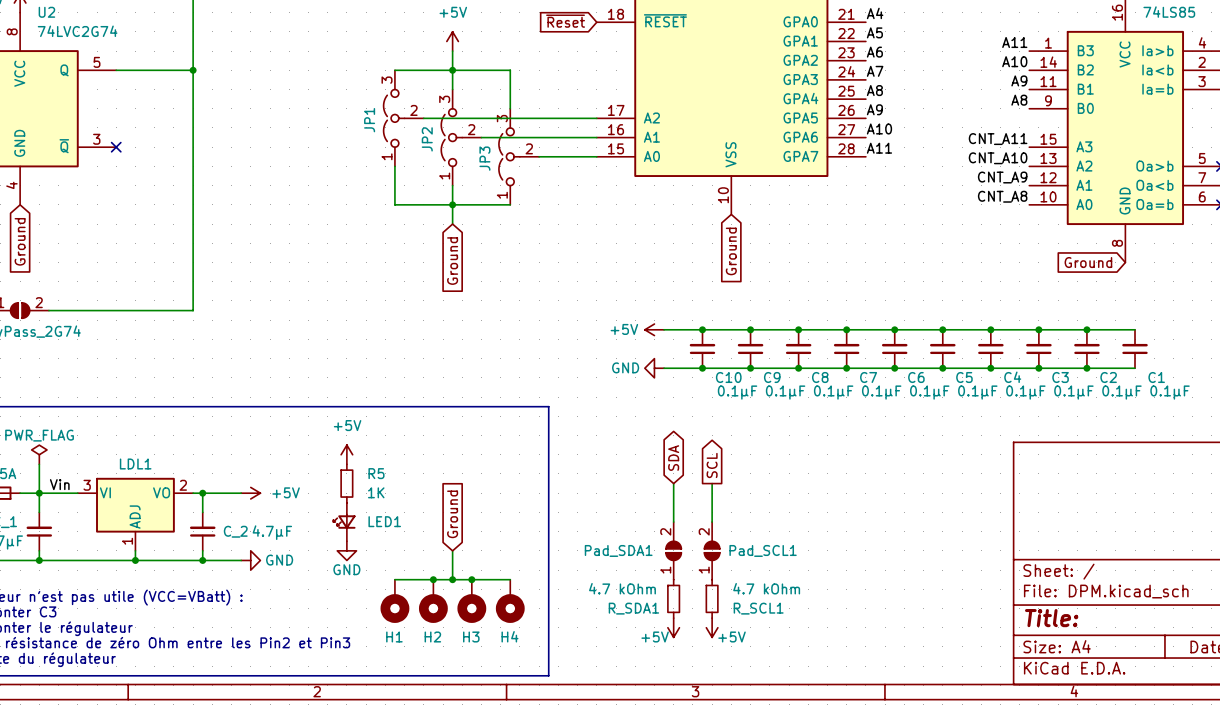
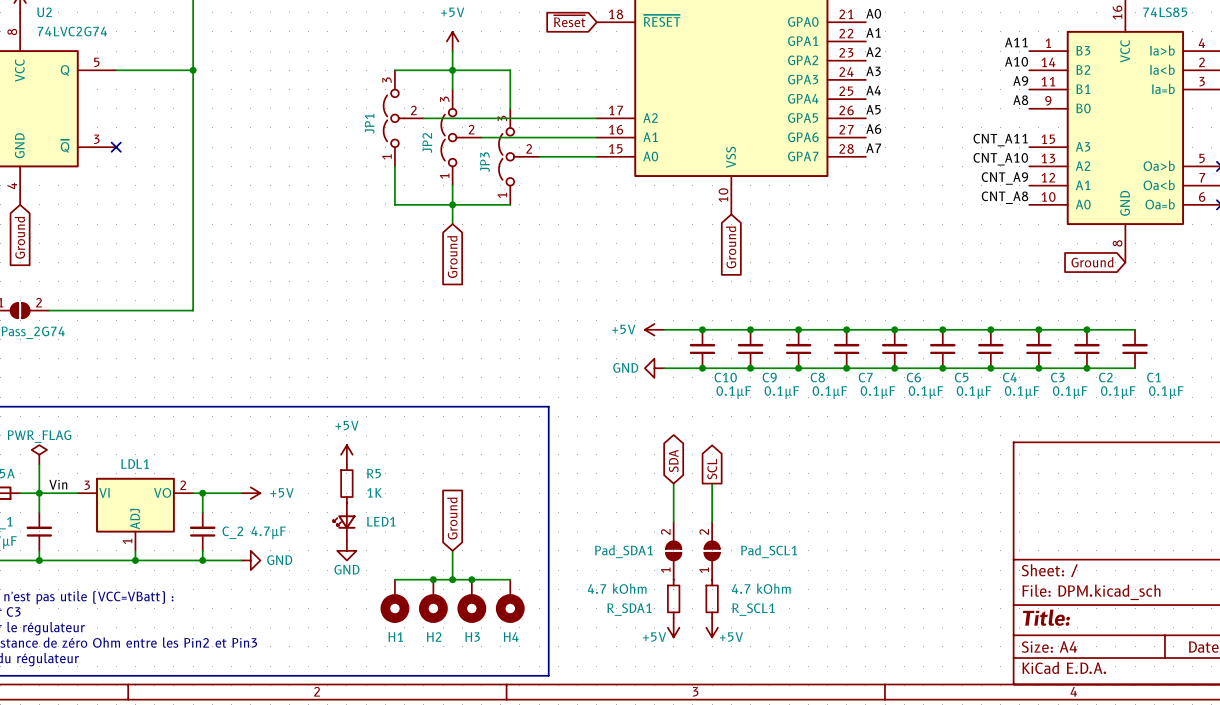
label: A4 (875, 13) -> A0 (873, 13)
label: A5 (874, 32) -> A1 (873, 32)
label: A6 (874, 52) -> A2 (873, 52)
label: A7 (875, 71) -> A3 (873, 71)
label: A8 (874, 90) -> A4 (873, 90)
label: A9 (874, 109) -> A5 (873, 109)
label: A10 (879, 129) -> A6 (873, 129)
label: A11 (879, 148) -> A7 (873, 148)

